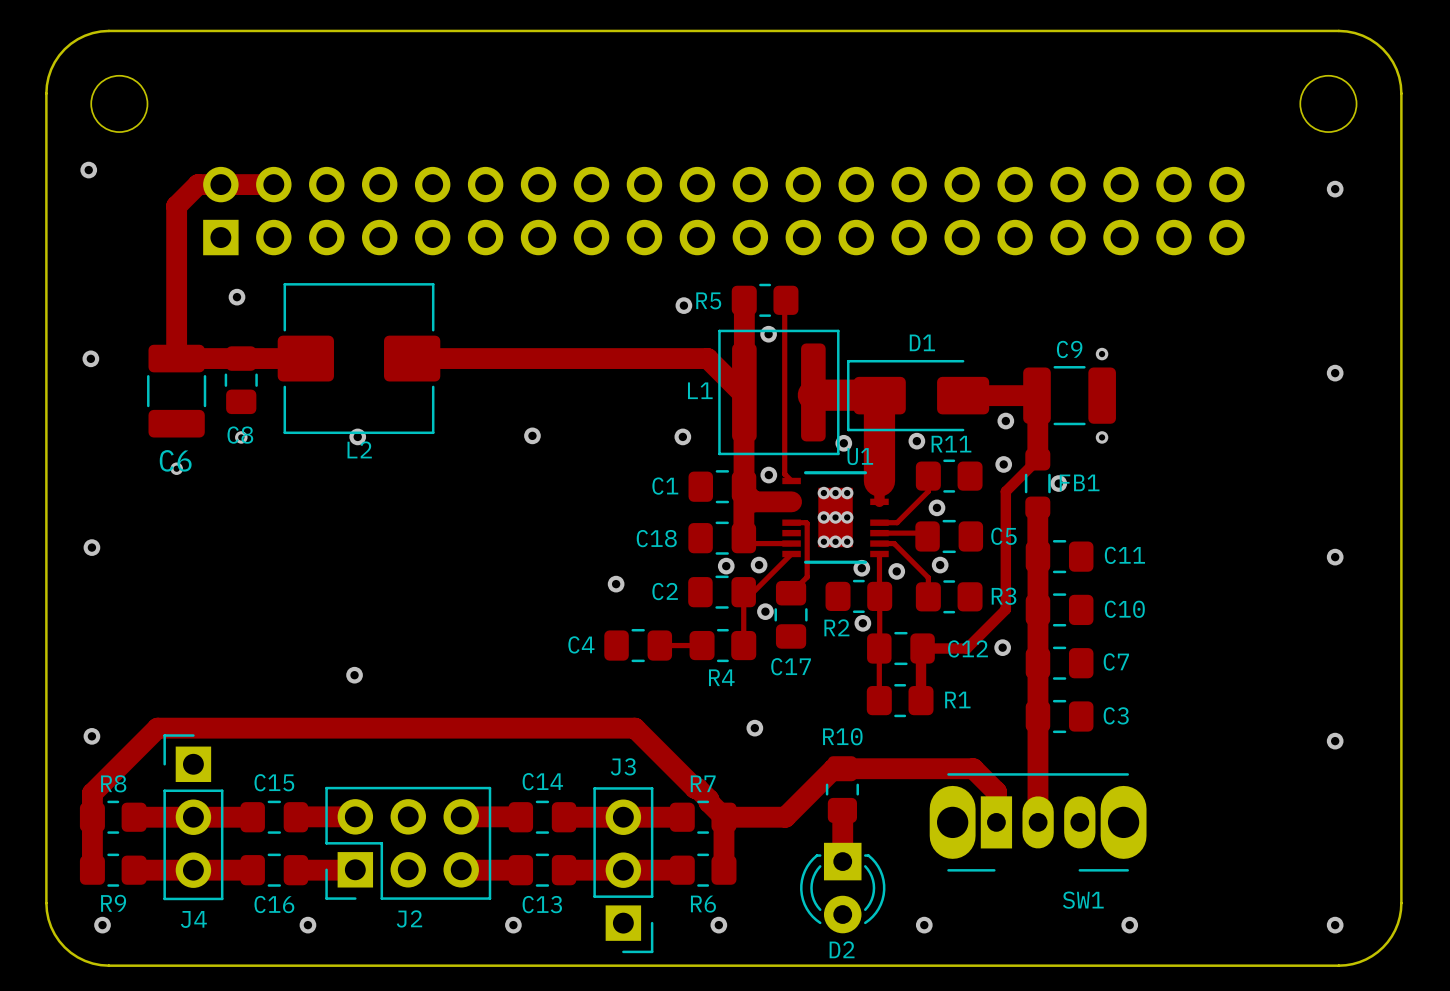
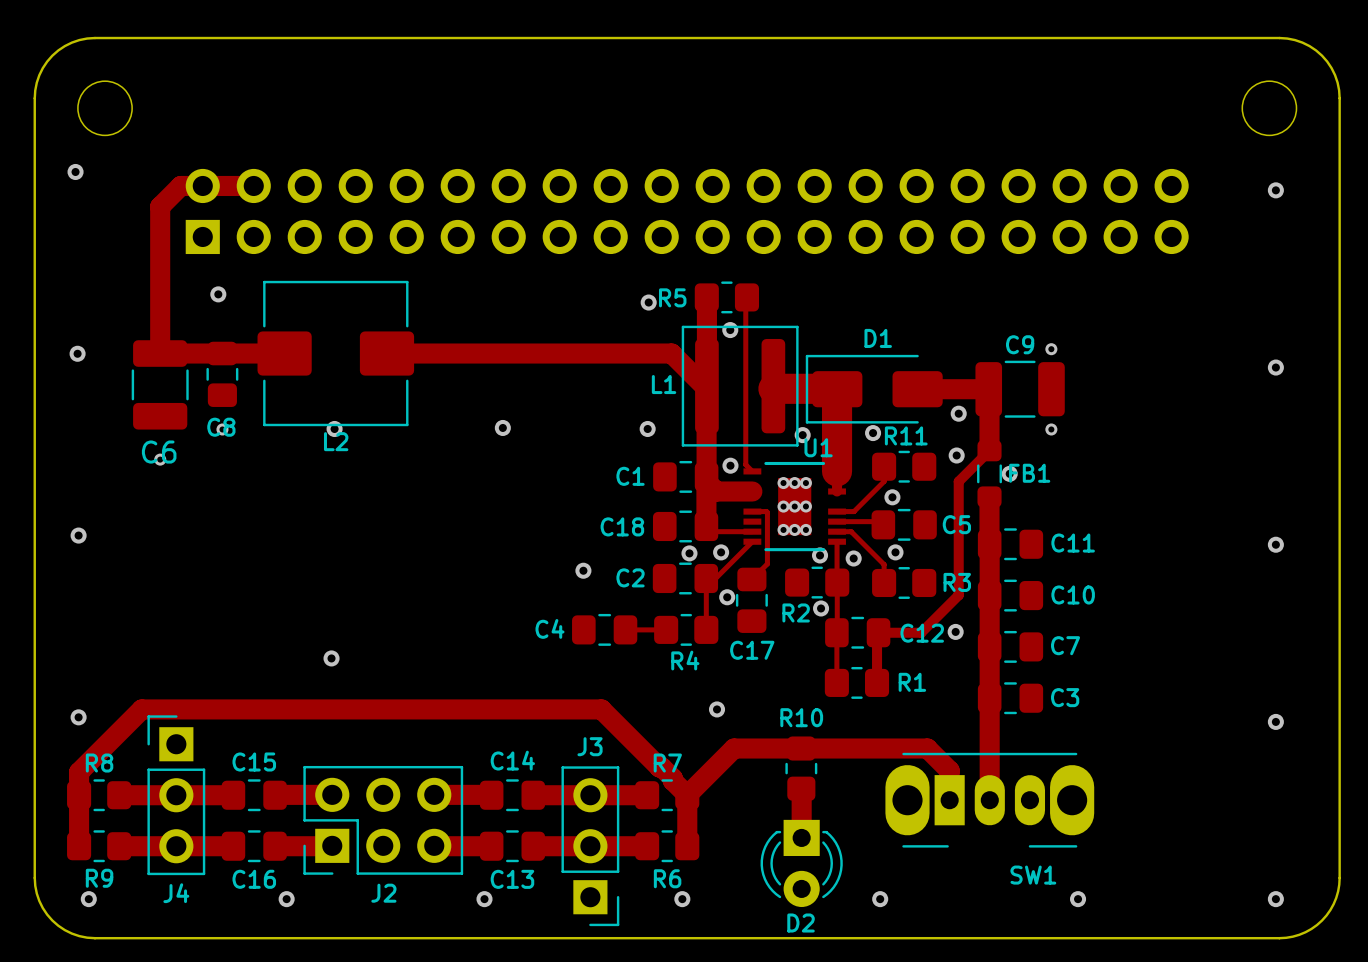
track: (833, 768) (785, 817) (723, 817) -> (793, 748) (734, 748) (687, 795)

